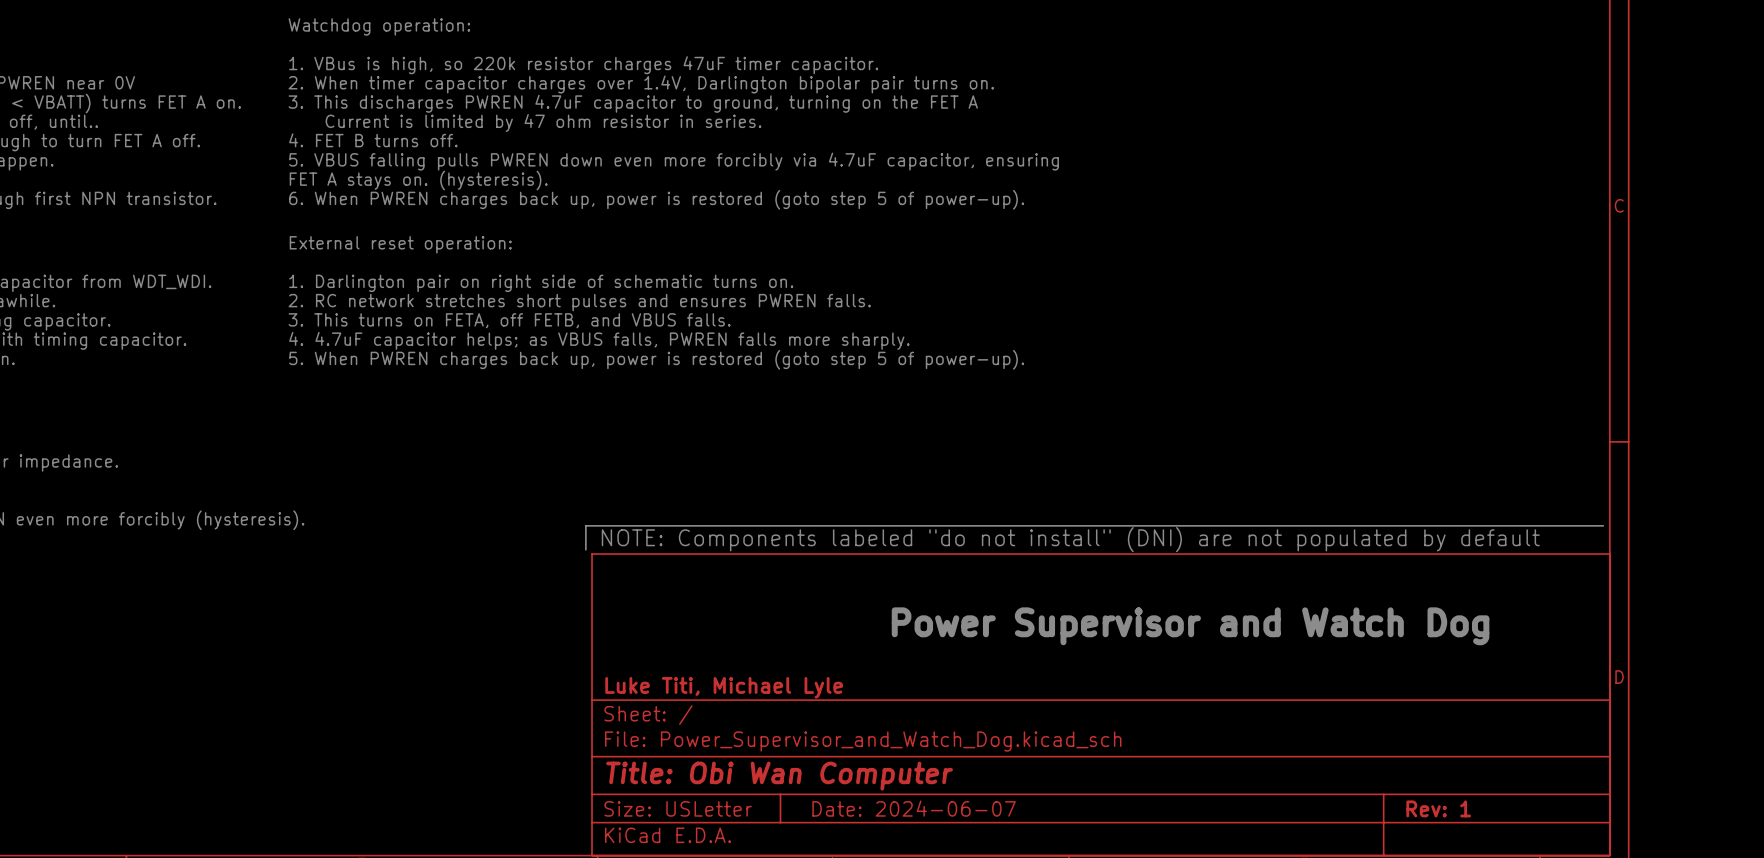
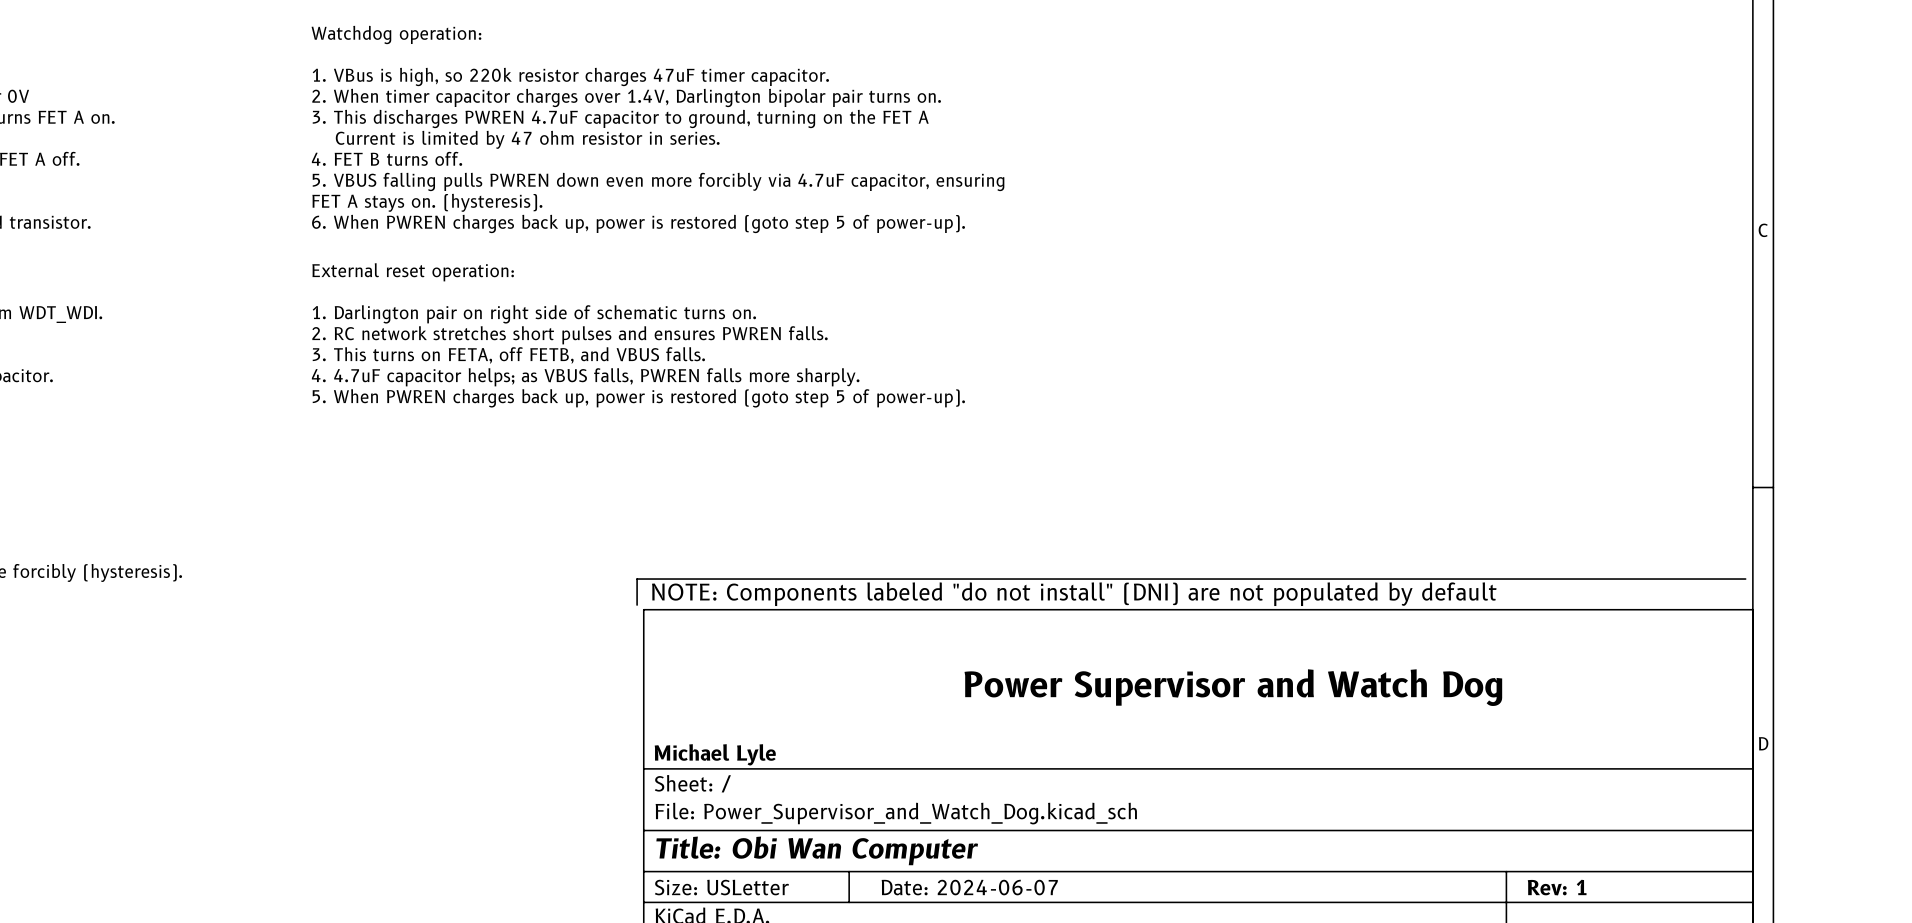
title block: Luke Titi, Michael Lyle (724, 687) -> Michael Lyle (715, 754)

